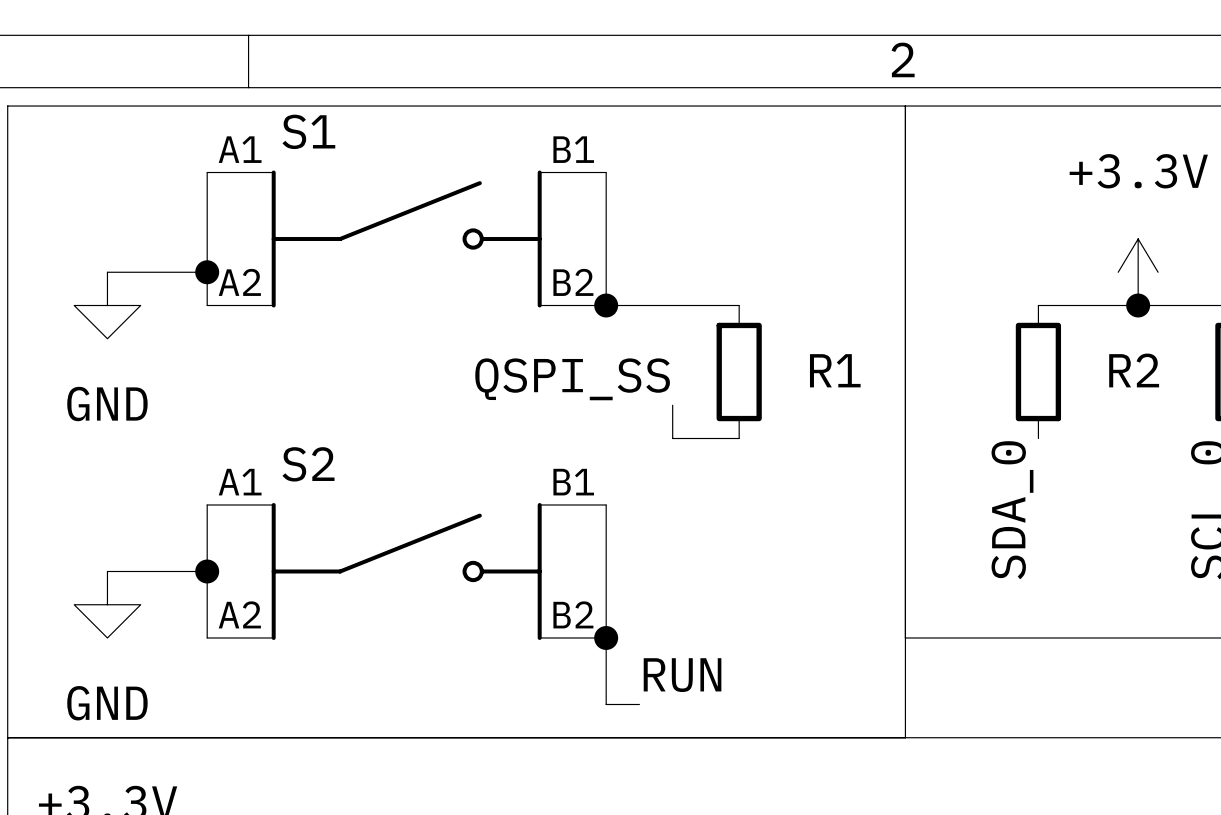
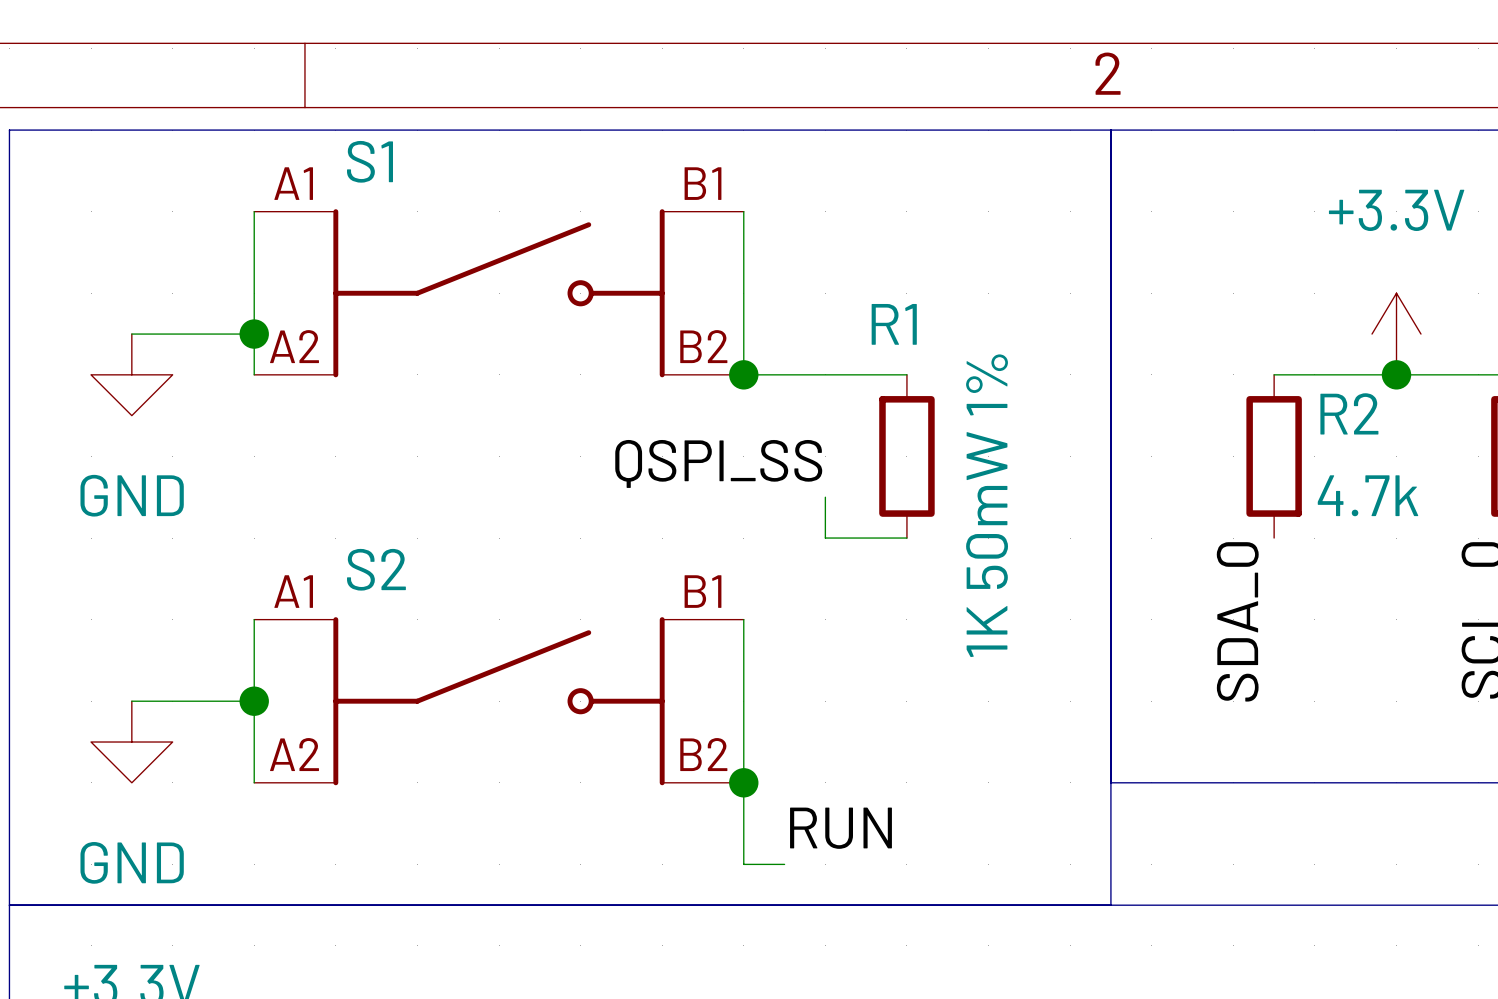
R1 name position: R1 (835, 370) -> R1 (894, 324)
R2 name position: R2 (1134, 370) -> R2 (1349, 413)
R1 value: none -> 1K 50mW 1% (987, 505)
R2 value: none -> 4.7k (1368, 495)

